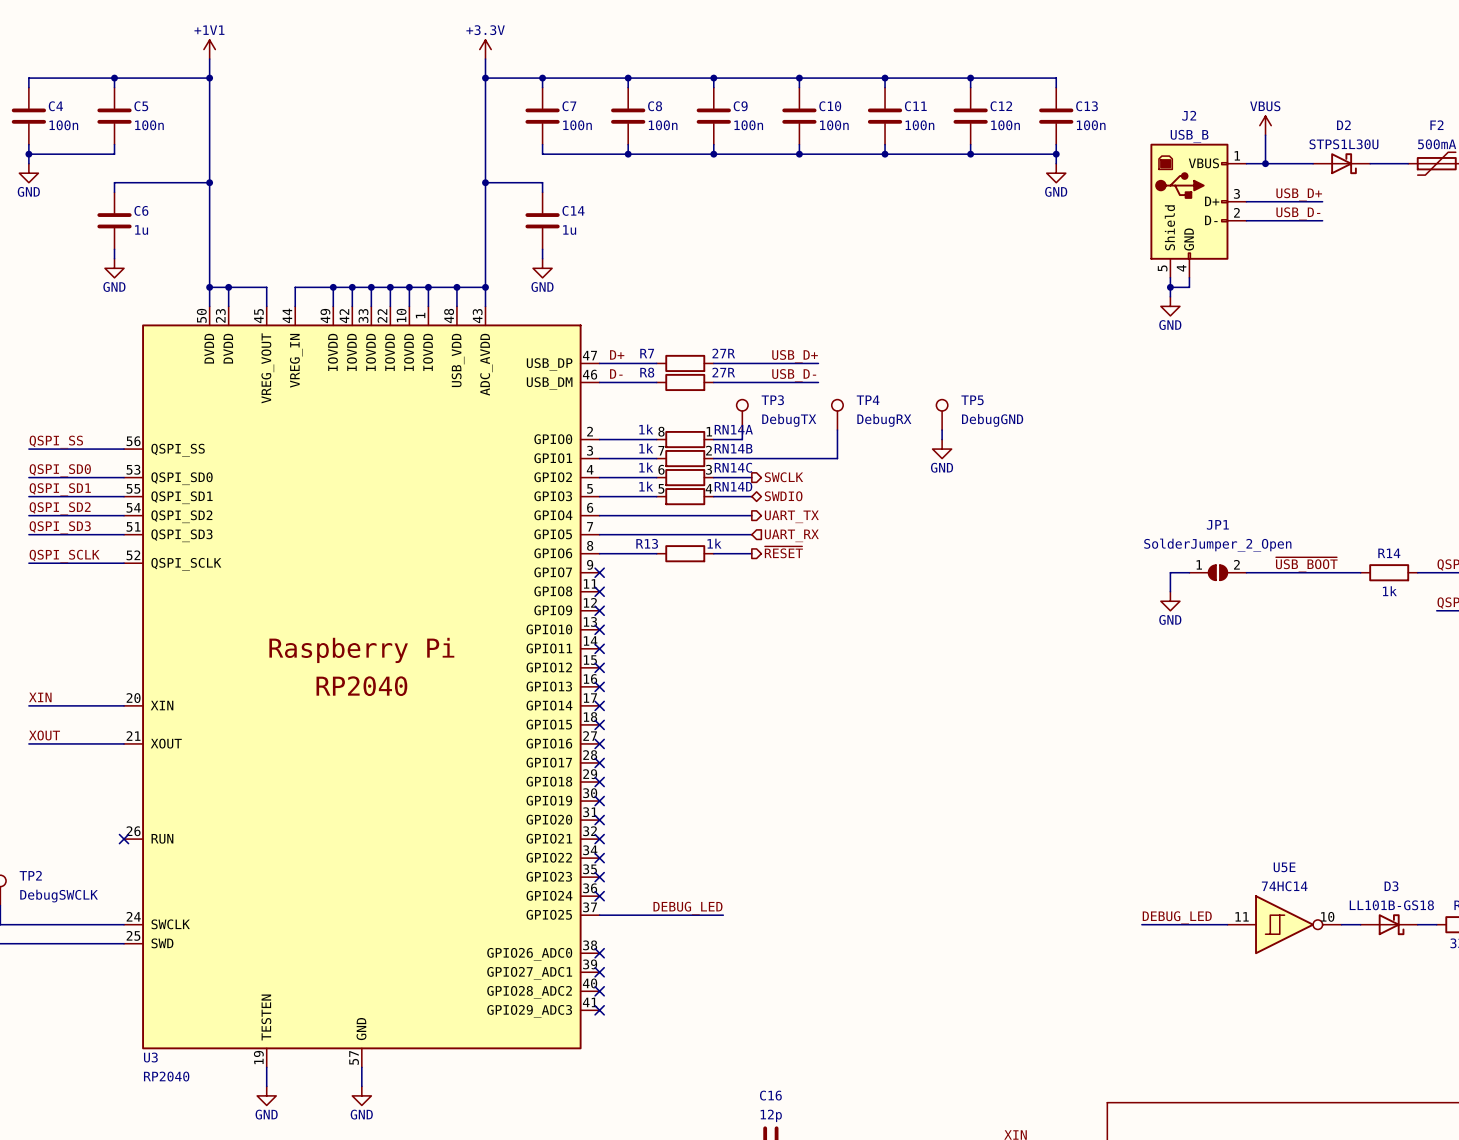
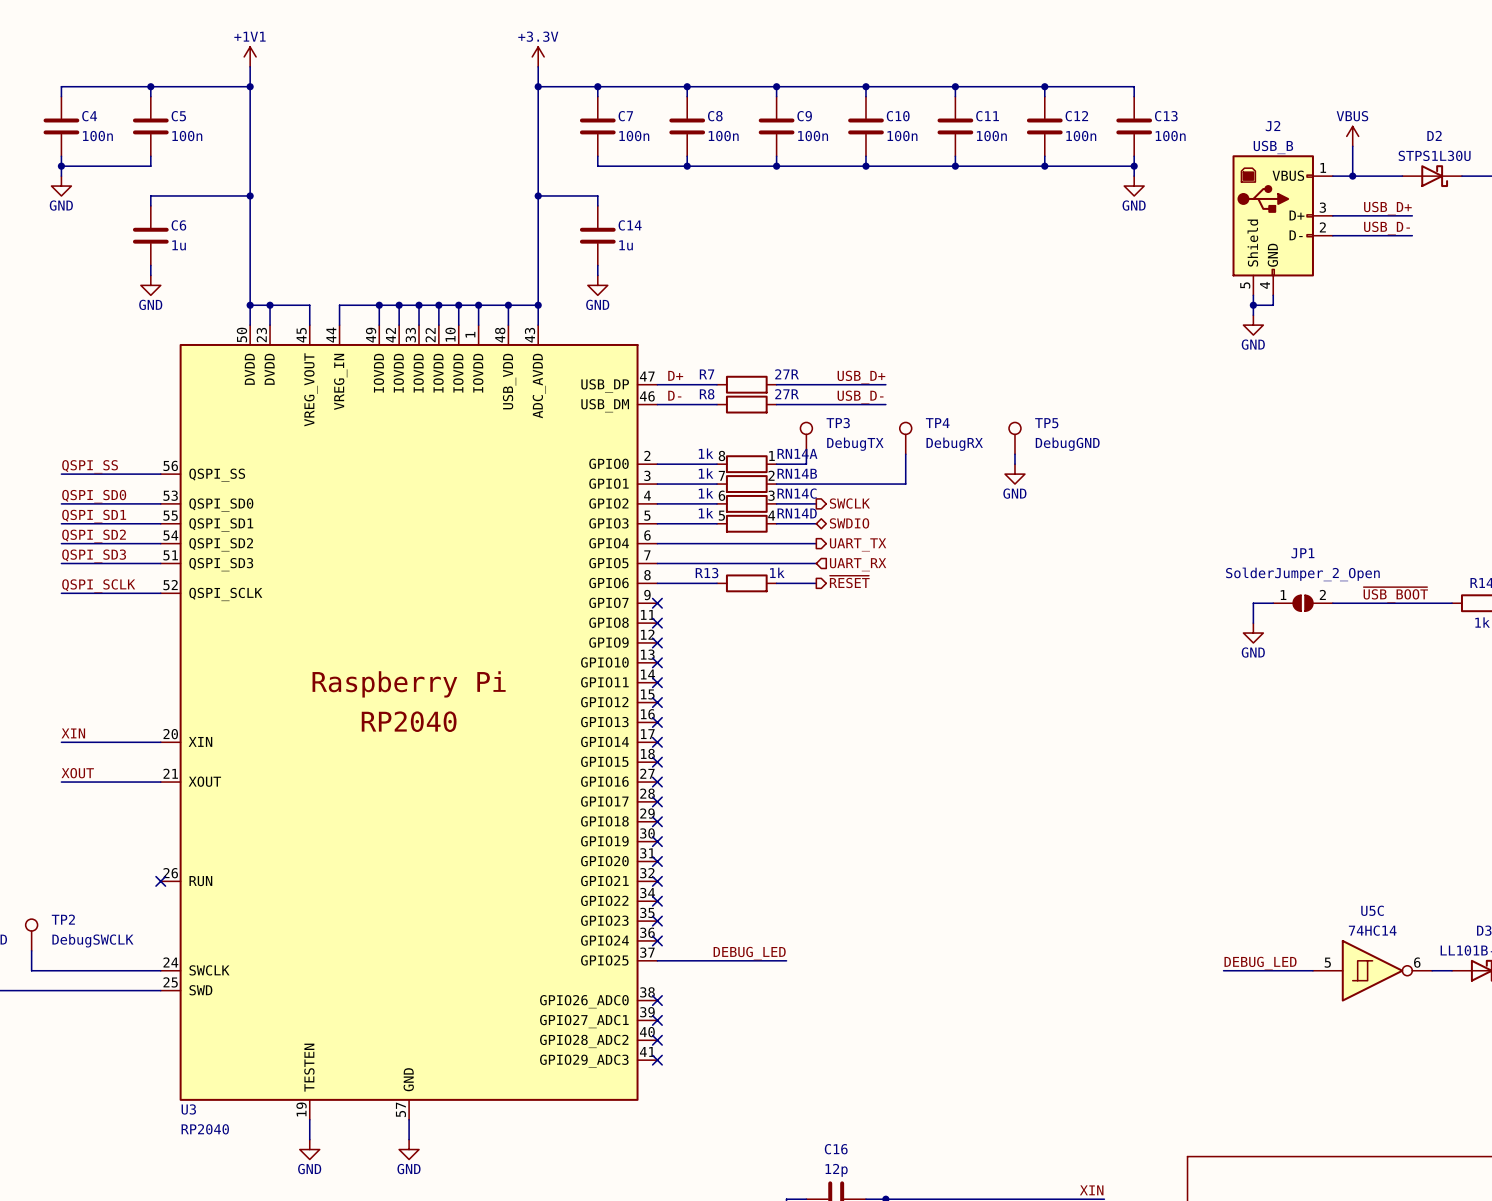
U5E name: U5E (1284, 867) -> U5C (1372, 910)
U5E pin number: 11 (1242, 916) -> 5 (1327, 962)
U5E pin number: 10 (1327, 916) -> 6 (1417, 962)

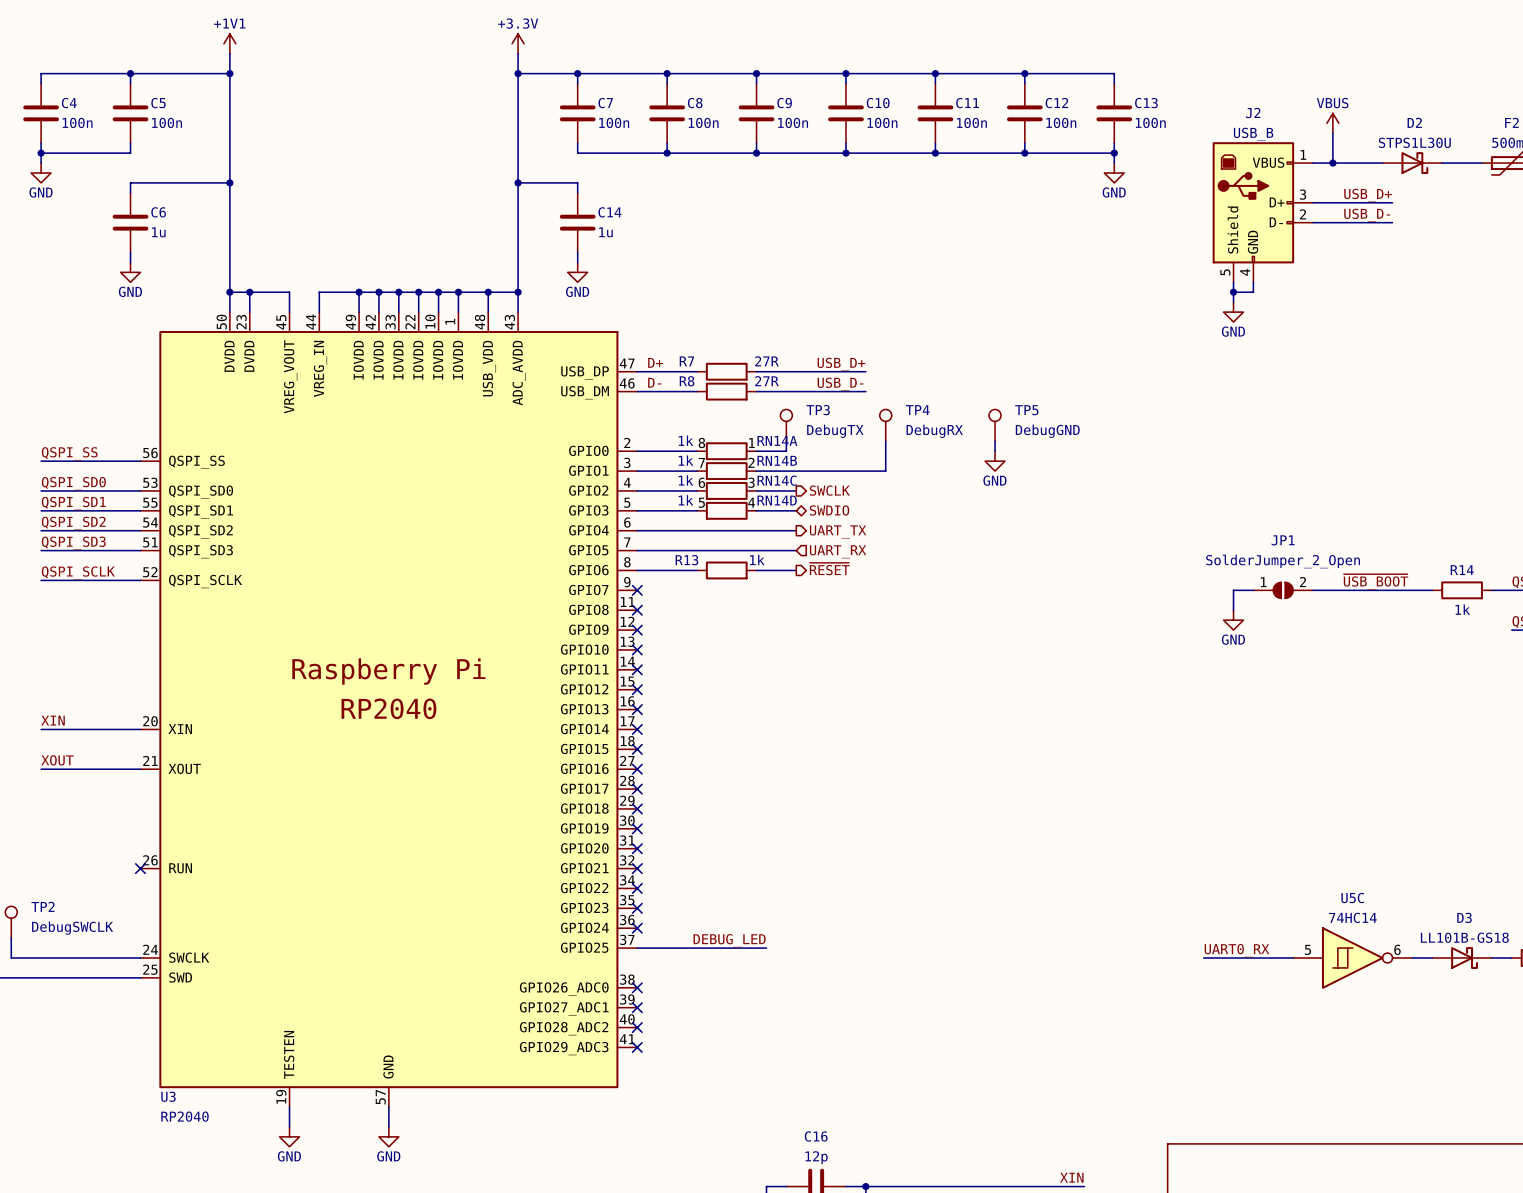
label: DEBUG_LED (1260, 963) -> UART0_RX (1236, 950)

